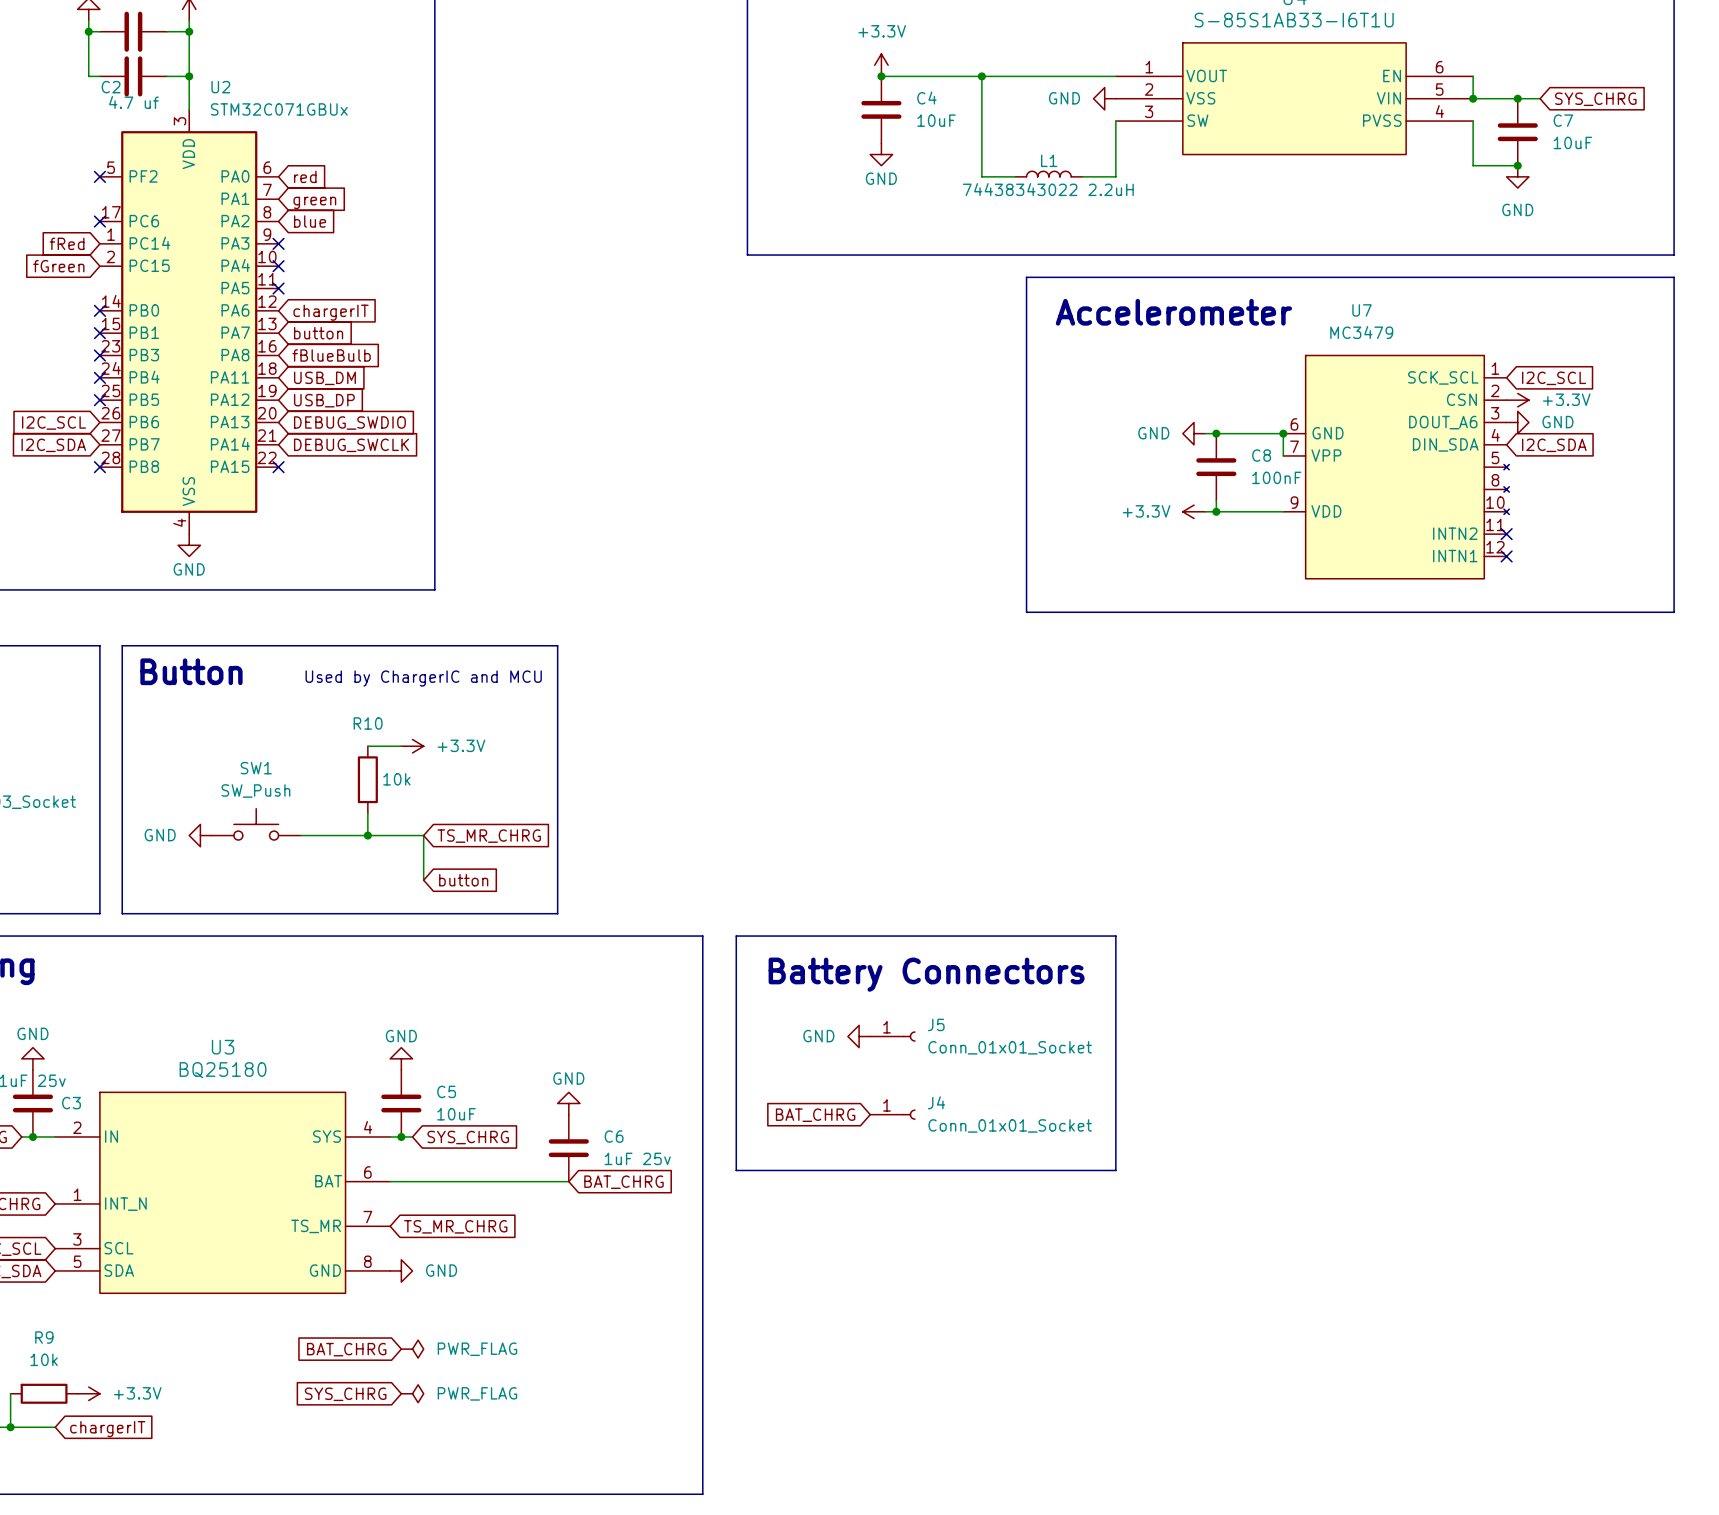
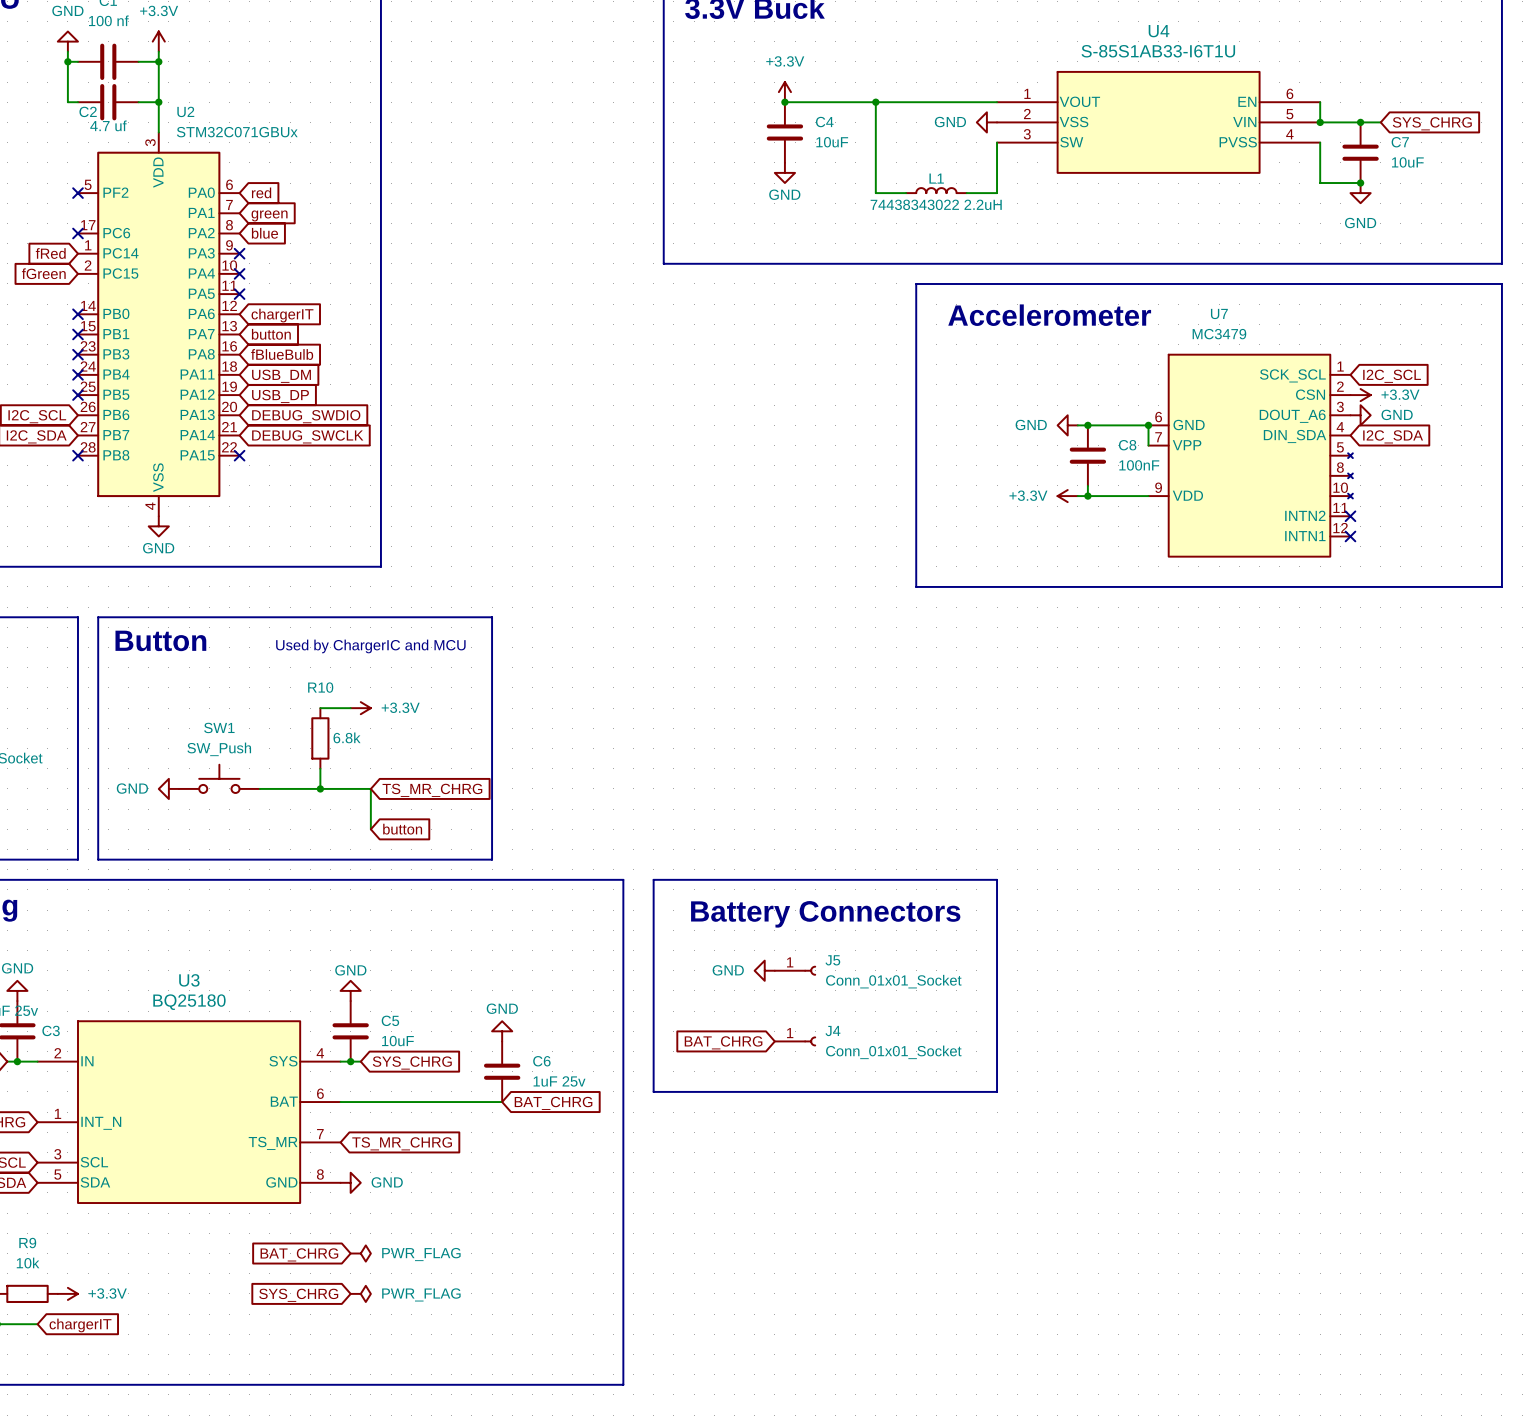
R10 value: 10k (396, 779) -> 6.8k (347, 737)

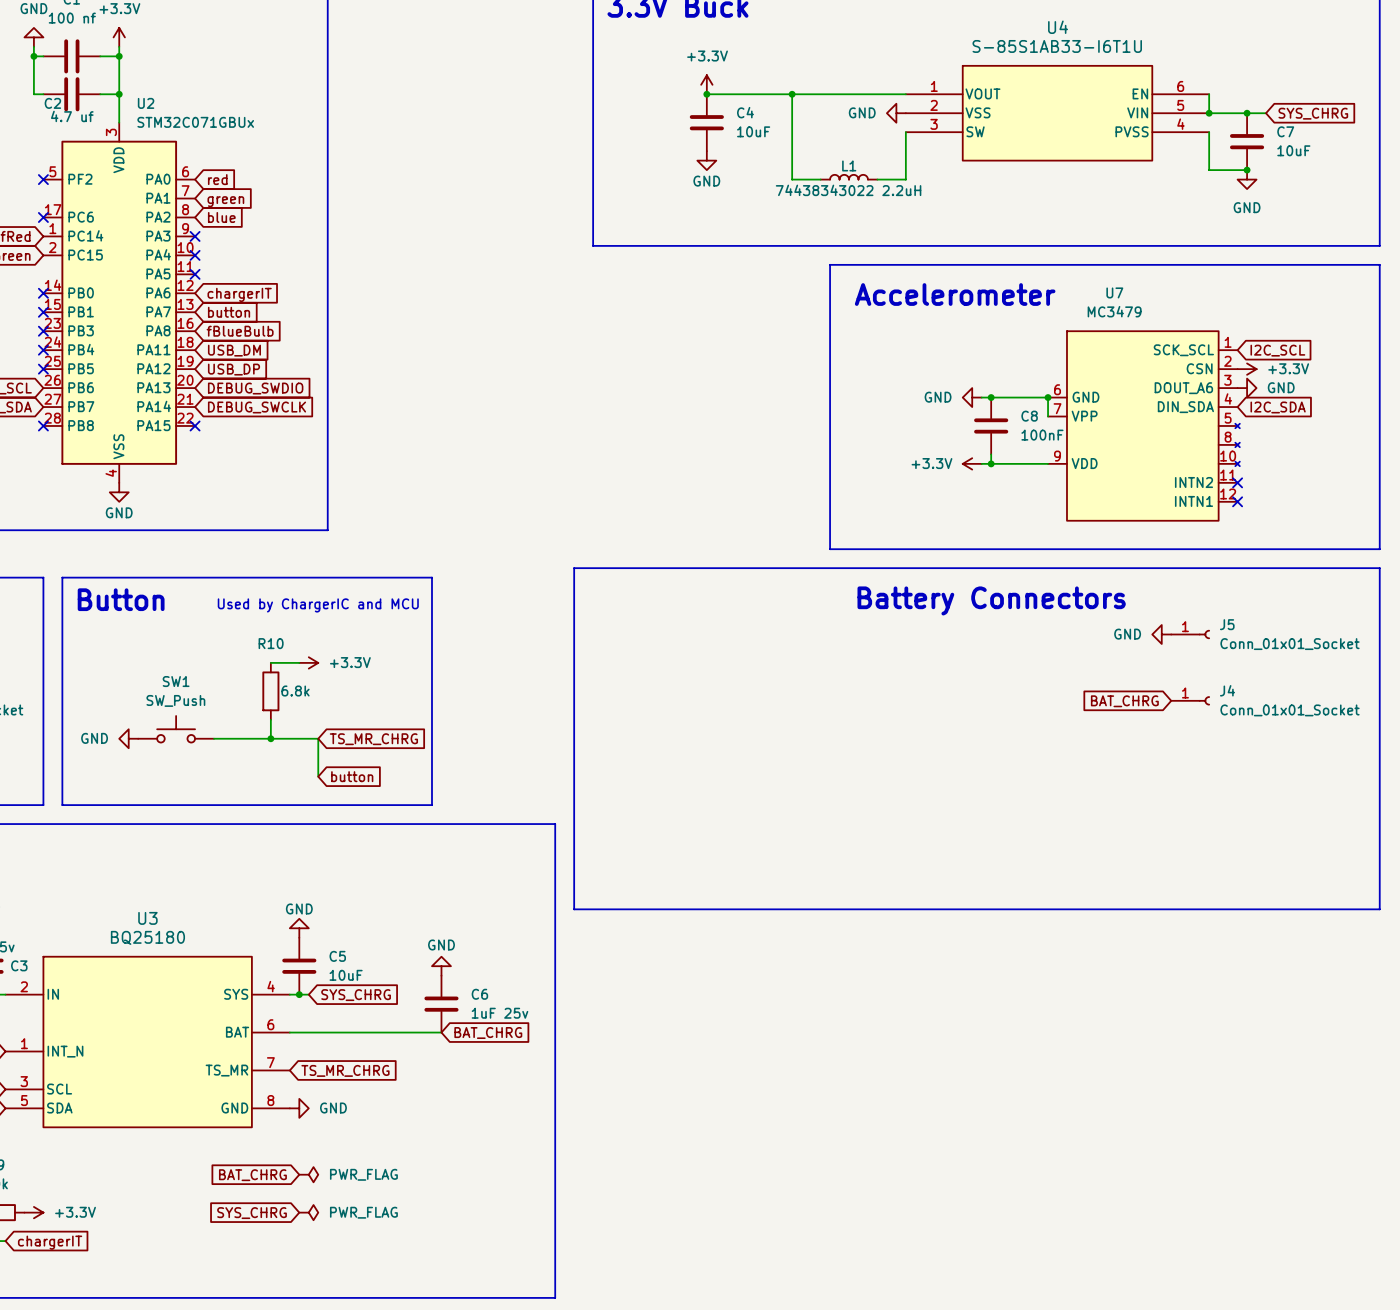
line: none -> (574, 568) (1379, 568) (1379, 909) (574, 909) (574, 568)
text: none -> Battery Connectors (991, 600)
power symbol: none -> GND (1161, 634)
global label: none -> BAT_CHRG (1124, 701)
line: (653, 879) (997, 879) (997, 1091) (653, 1091) (653, 879) -> none
text: Battery Connectors (825, 914) -> none
power symbol: GND (764, 970) -> none
J5 position: (795, 970) -> (1190, 634)
J4 position: (795, 1041) -> (1190, 700)
global label: BAT_CHRG (723, 1042) -> none

